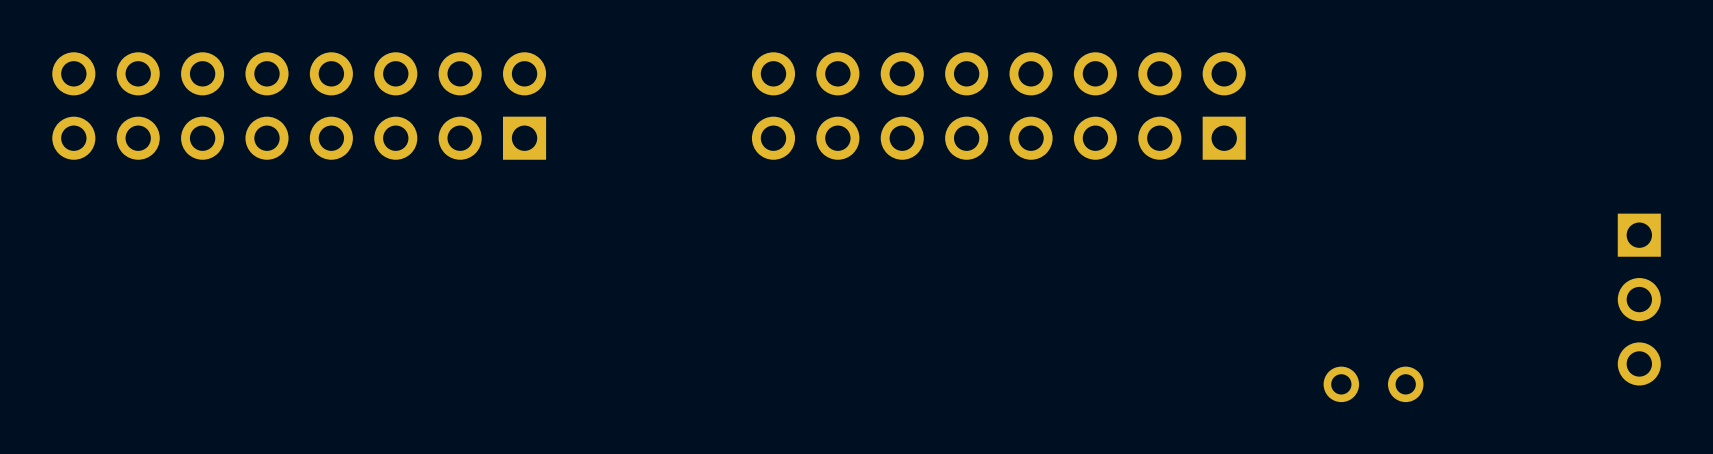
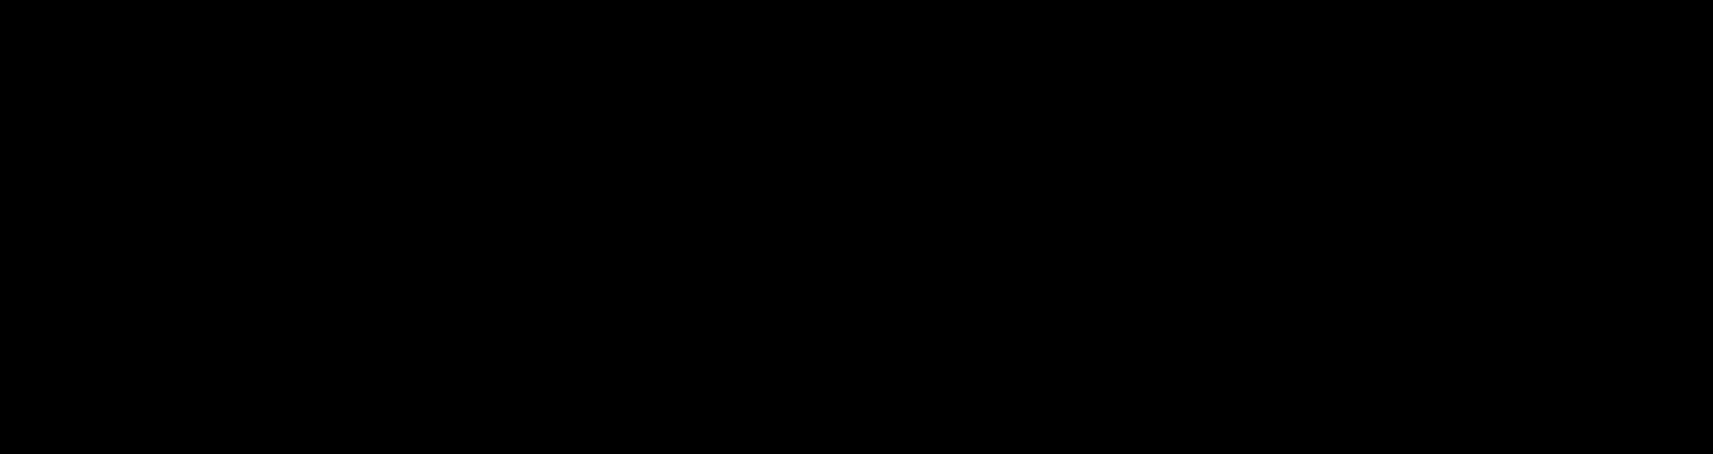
part: (299, 106) -> none
part: (998, 106) -> none
part: (1639, 299) -> none
part: (1373, 384) -> none

